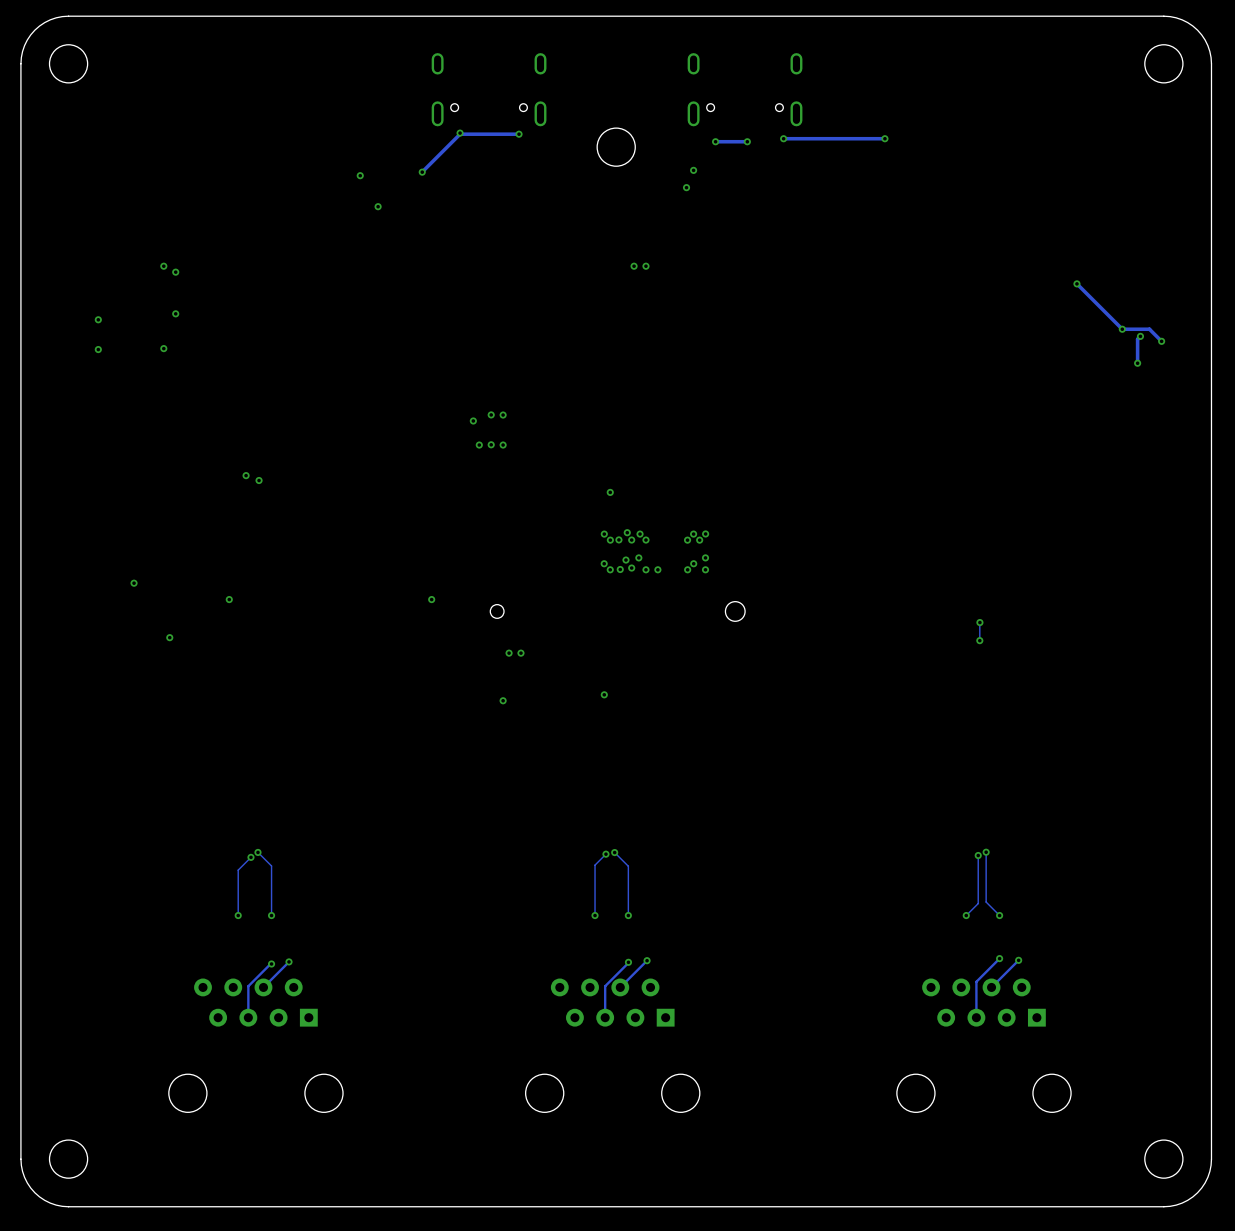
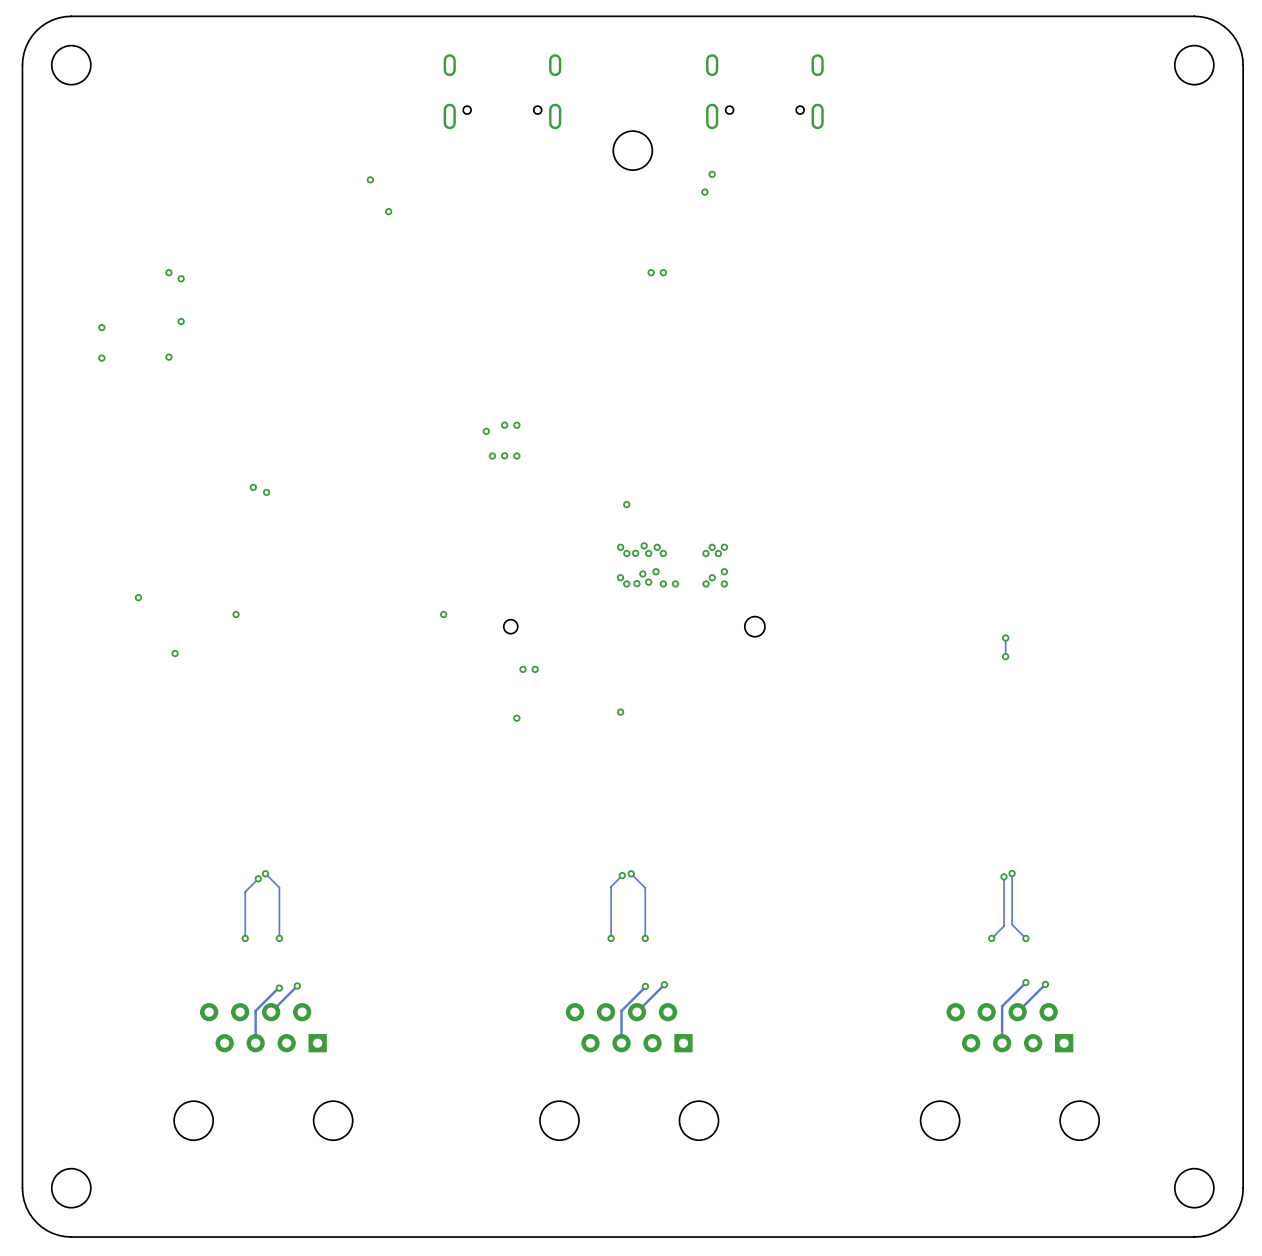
via: (460, 133) -> none
track: (460, 134) (422, 171) -> none
track: (519, 134) (460, 134) -> none
via: (519, 134) -> none
via: (783, 138) -> none
track: (884, 138) (783, 138) -> none
via: (884, 138) -> none
via: (715, 141) -> none
track: (747, 141) (715, 141) -> none
via: (747, 141) -> none
via: (422, 172) -> none
track: (1076, 283) (1122, 329) (1149, 329) (1161, 341) -> none
via: (1076, 283) -> none
via: (1122, 329) -> none
track: (1140, 336) (1137, 339) (1137, 363) -> none
via: (1140, 336) -> none
via: (1161, 341) -> none
via: (1137, 363) -> none

